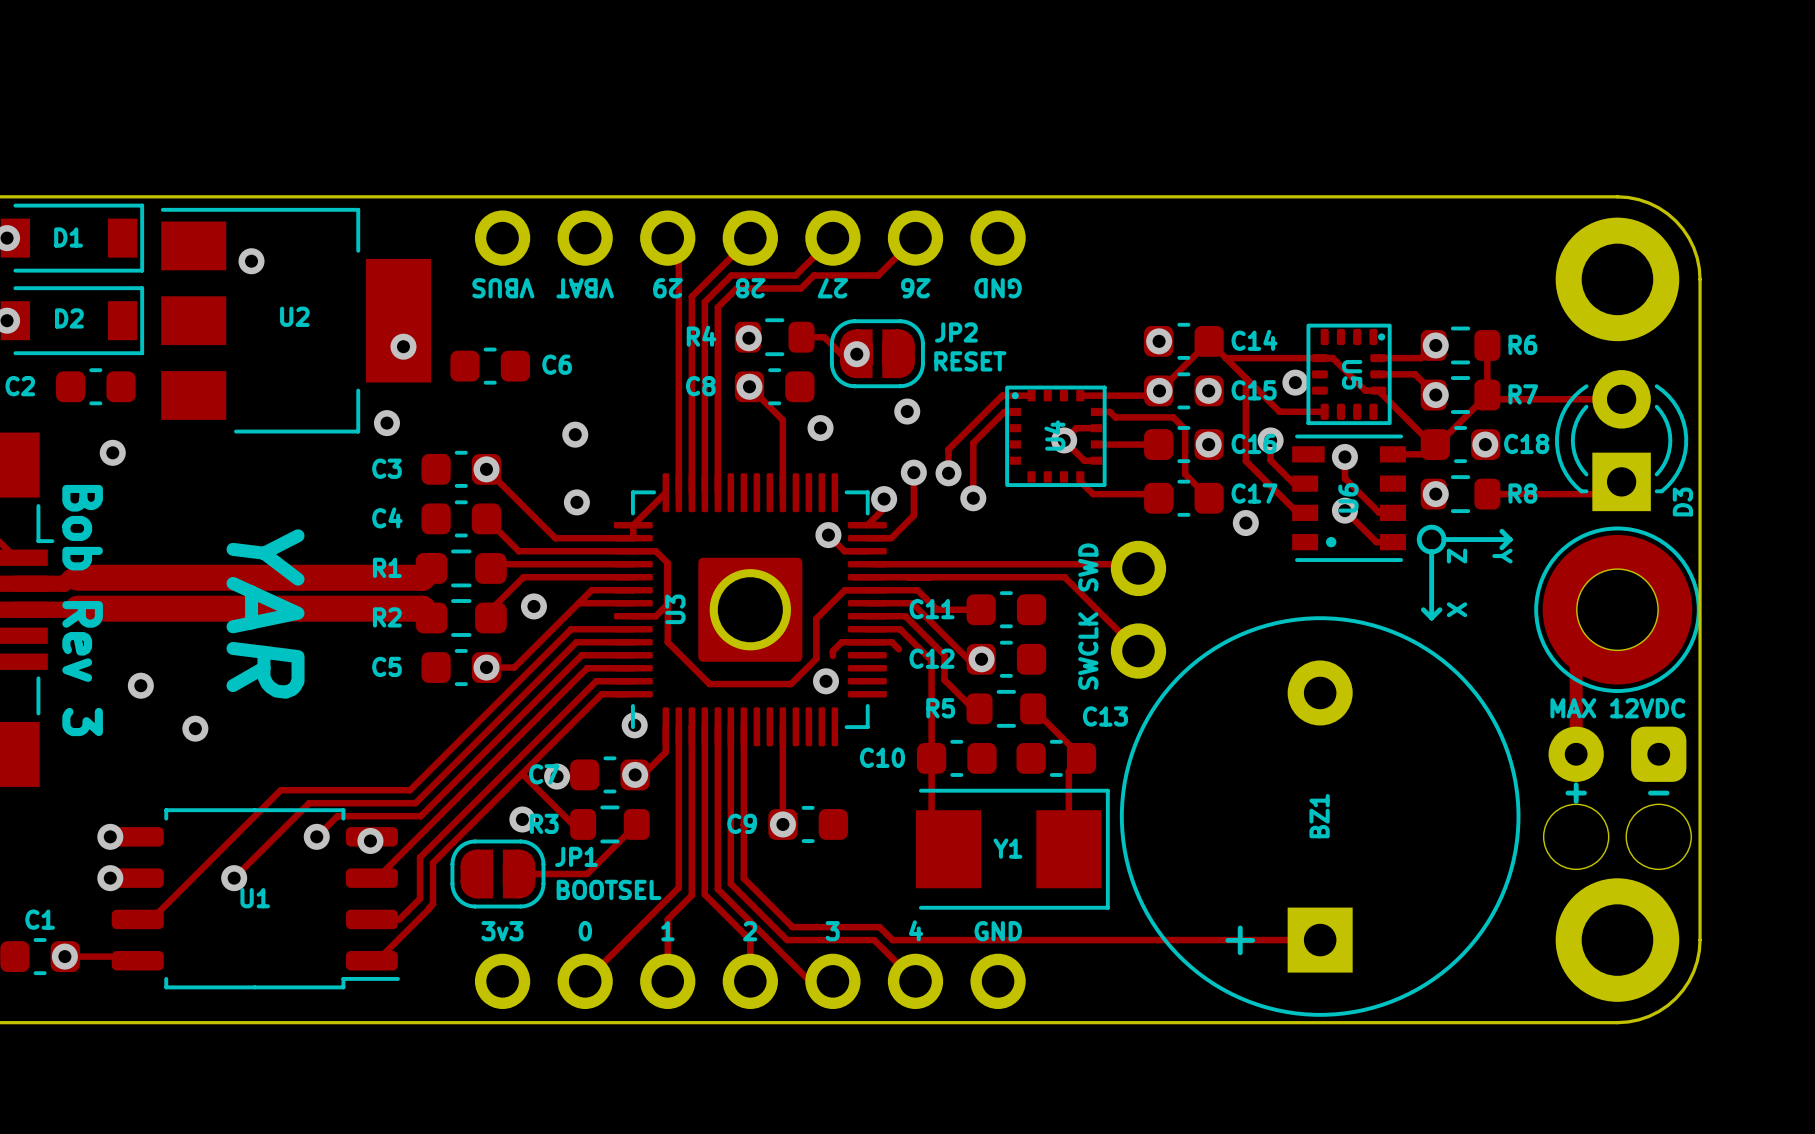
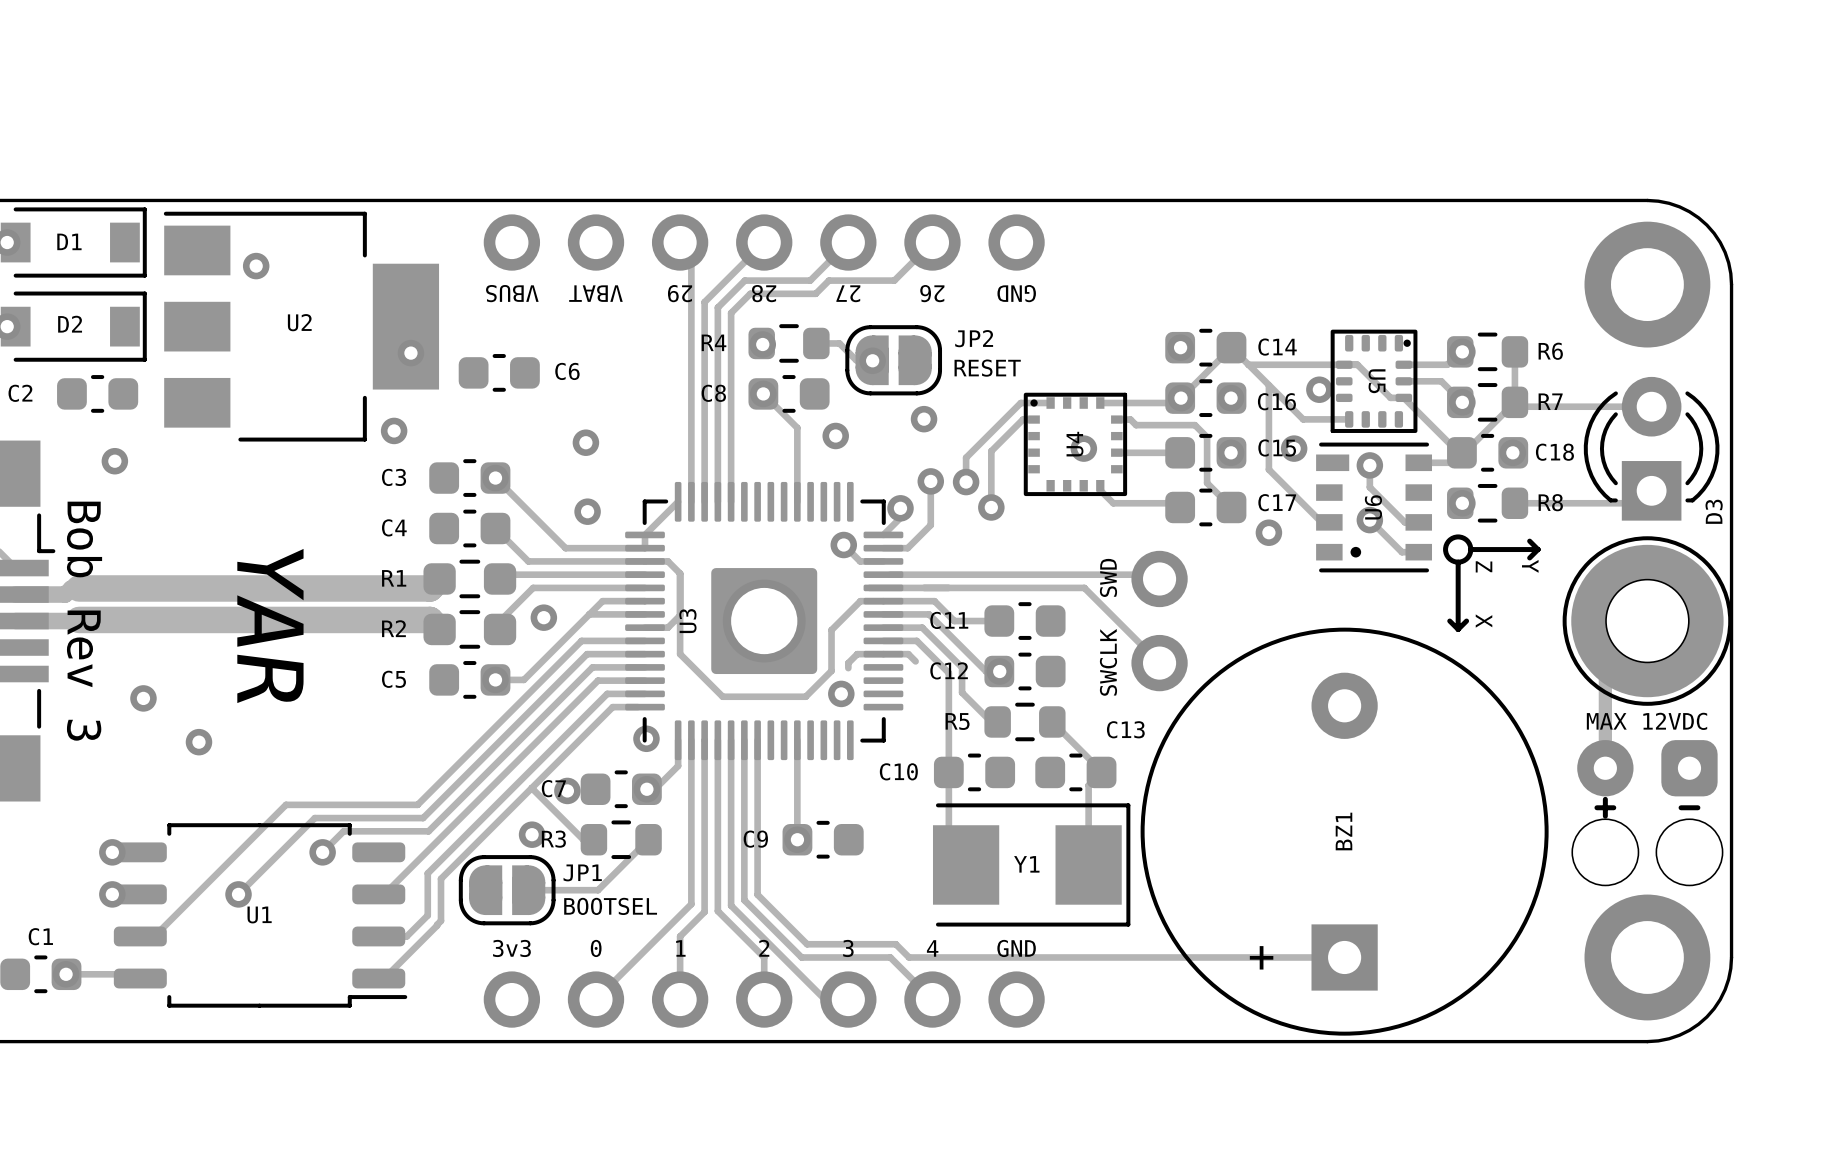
C15 name position: C15 (1254, 390) -> C15 (1277, 447)
track: (1096, 428) (1076, 428) (1064, 440) (1084, 460) (1096, 460) -> none
track: (1270, 440) (1270, 460) (1293, 483) (1305, 483) -> none
C16 name position: C16 (1254, 443) -> C16 (1276, 401)
via: (370, 840) -> none

